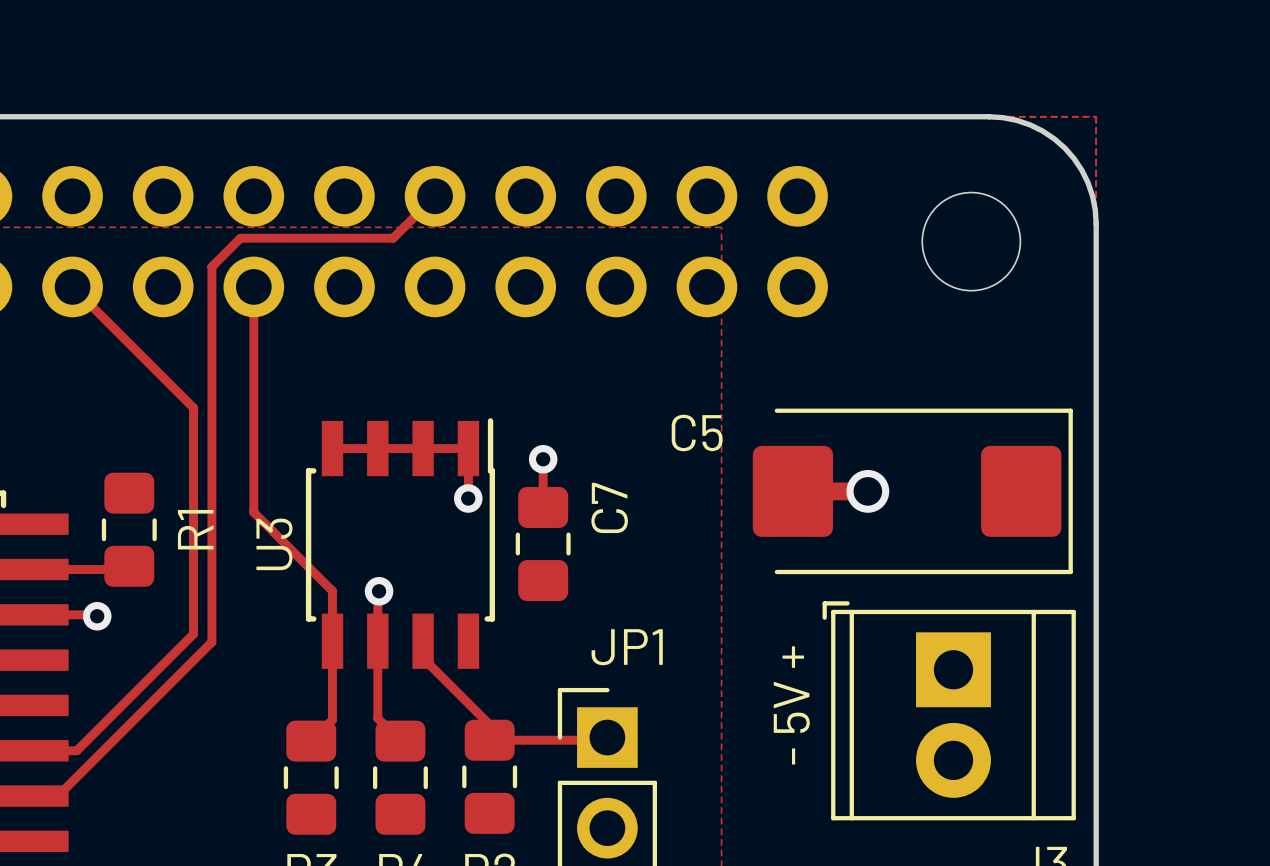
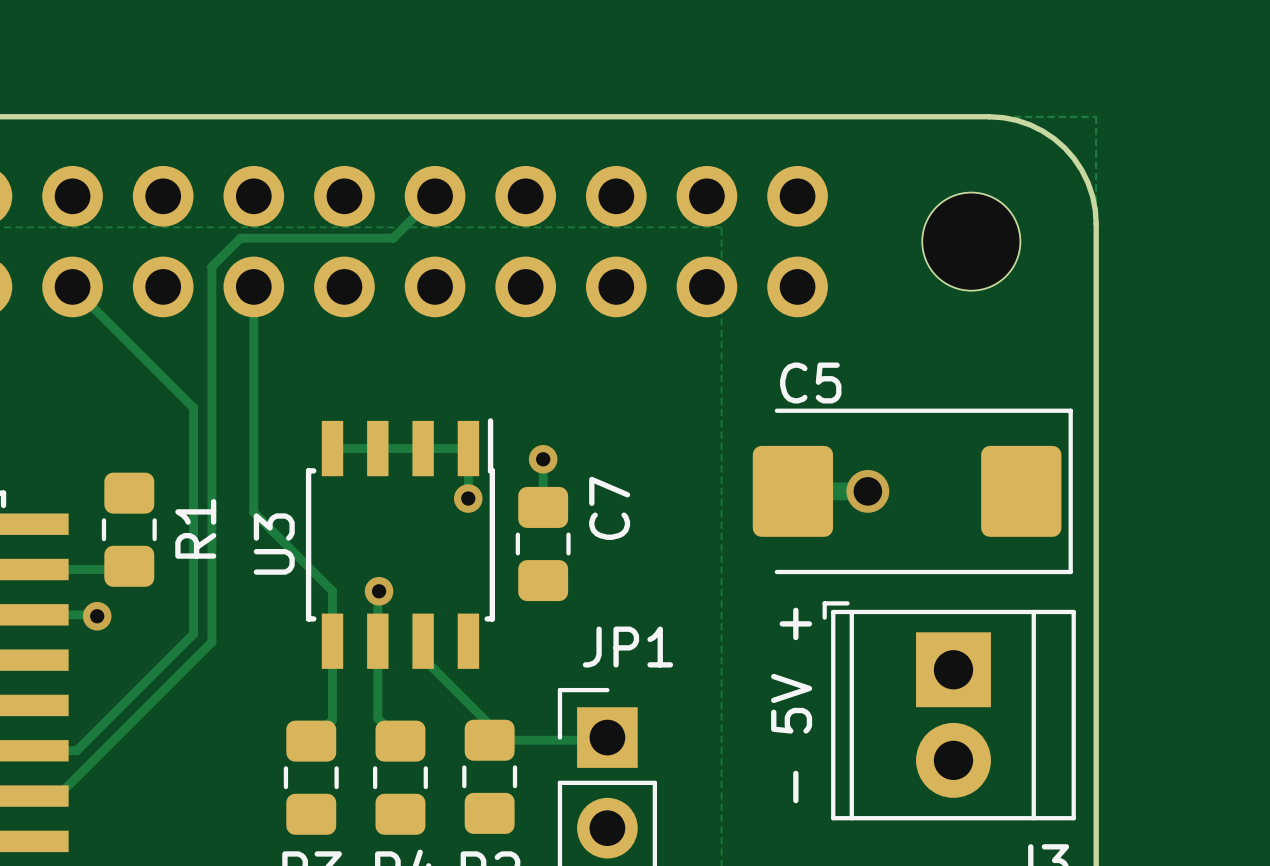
C5 name position: C5 (697, 432) -> C5 (810, 383)

